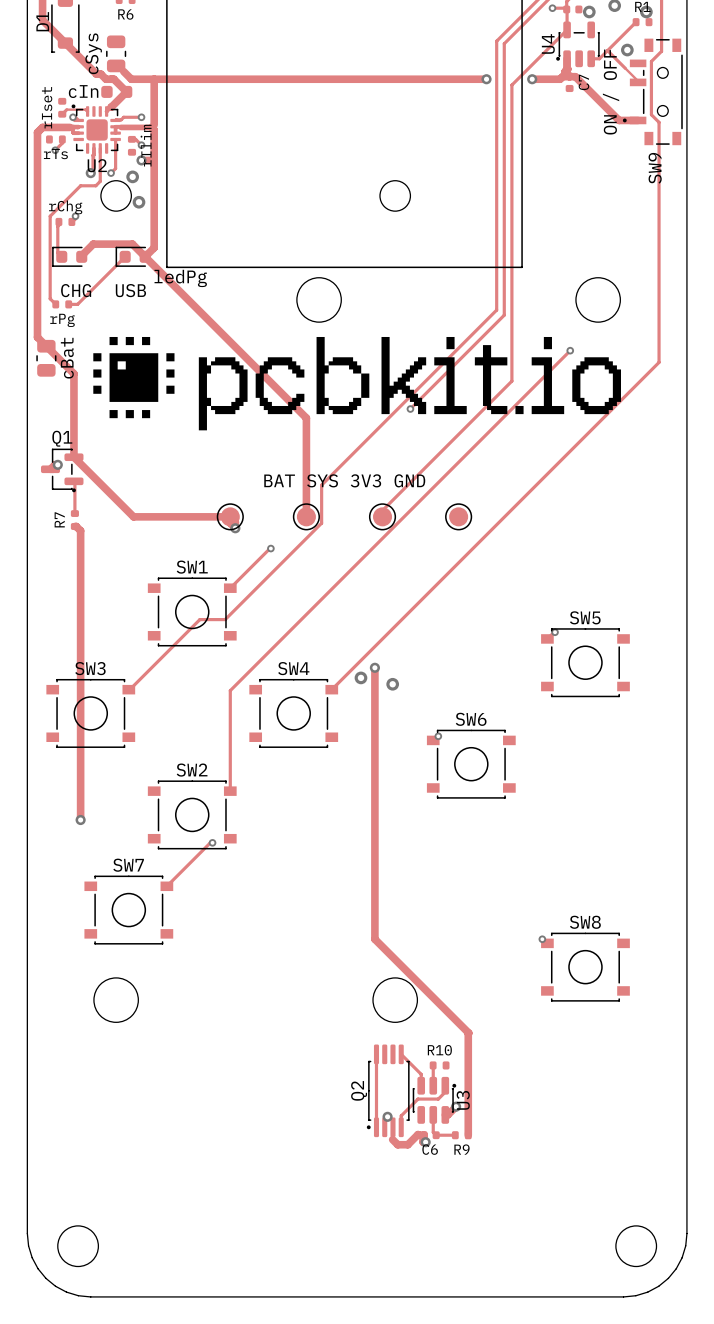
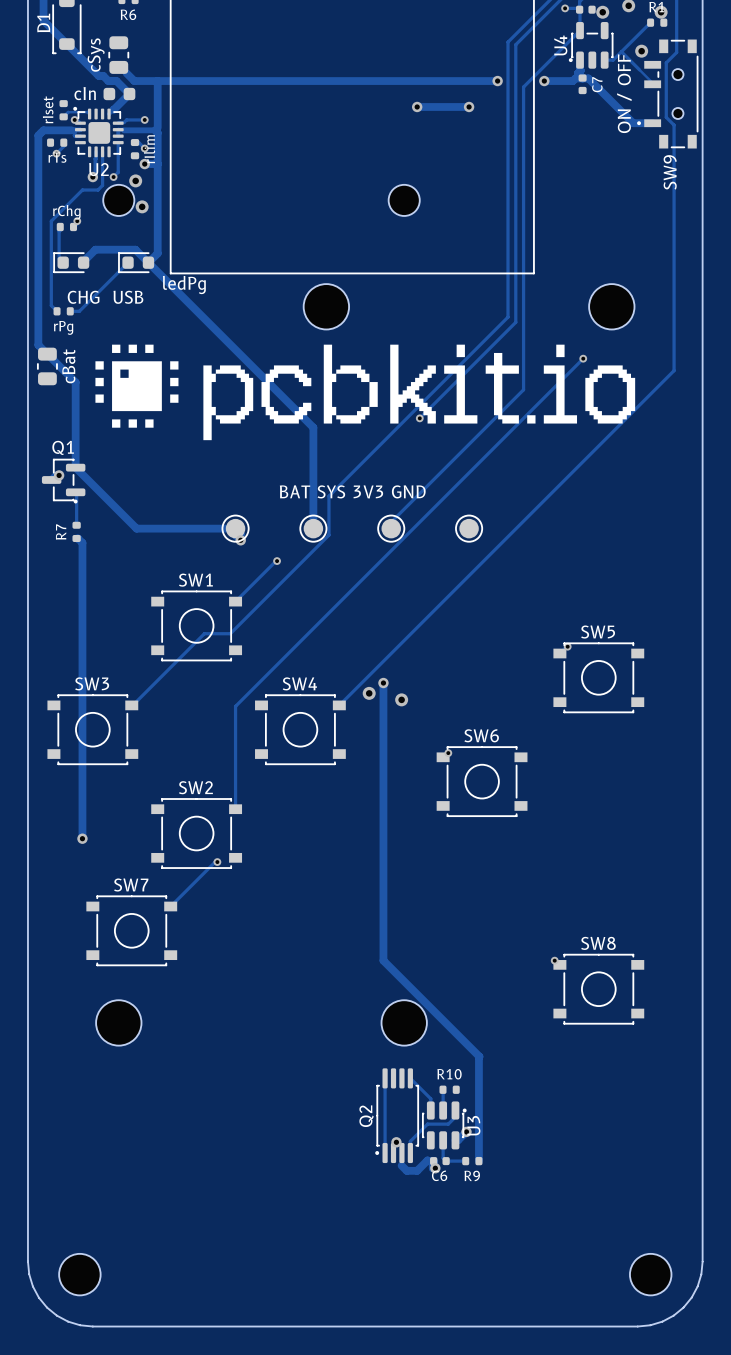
track: none -> (417, 106) (469, 106)
via: none -> (417, 106)
via: none -> (469, 106)

